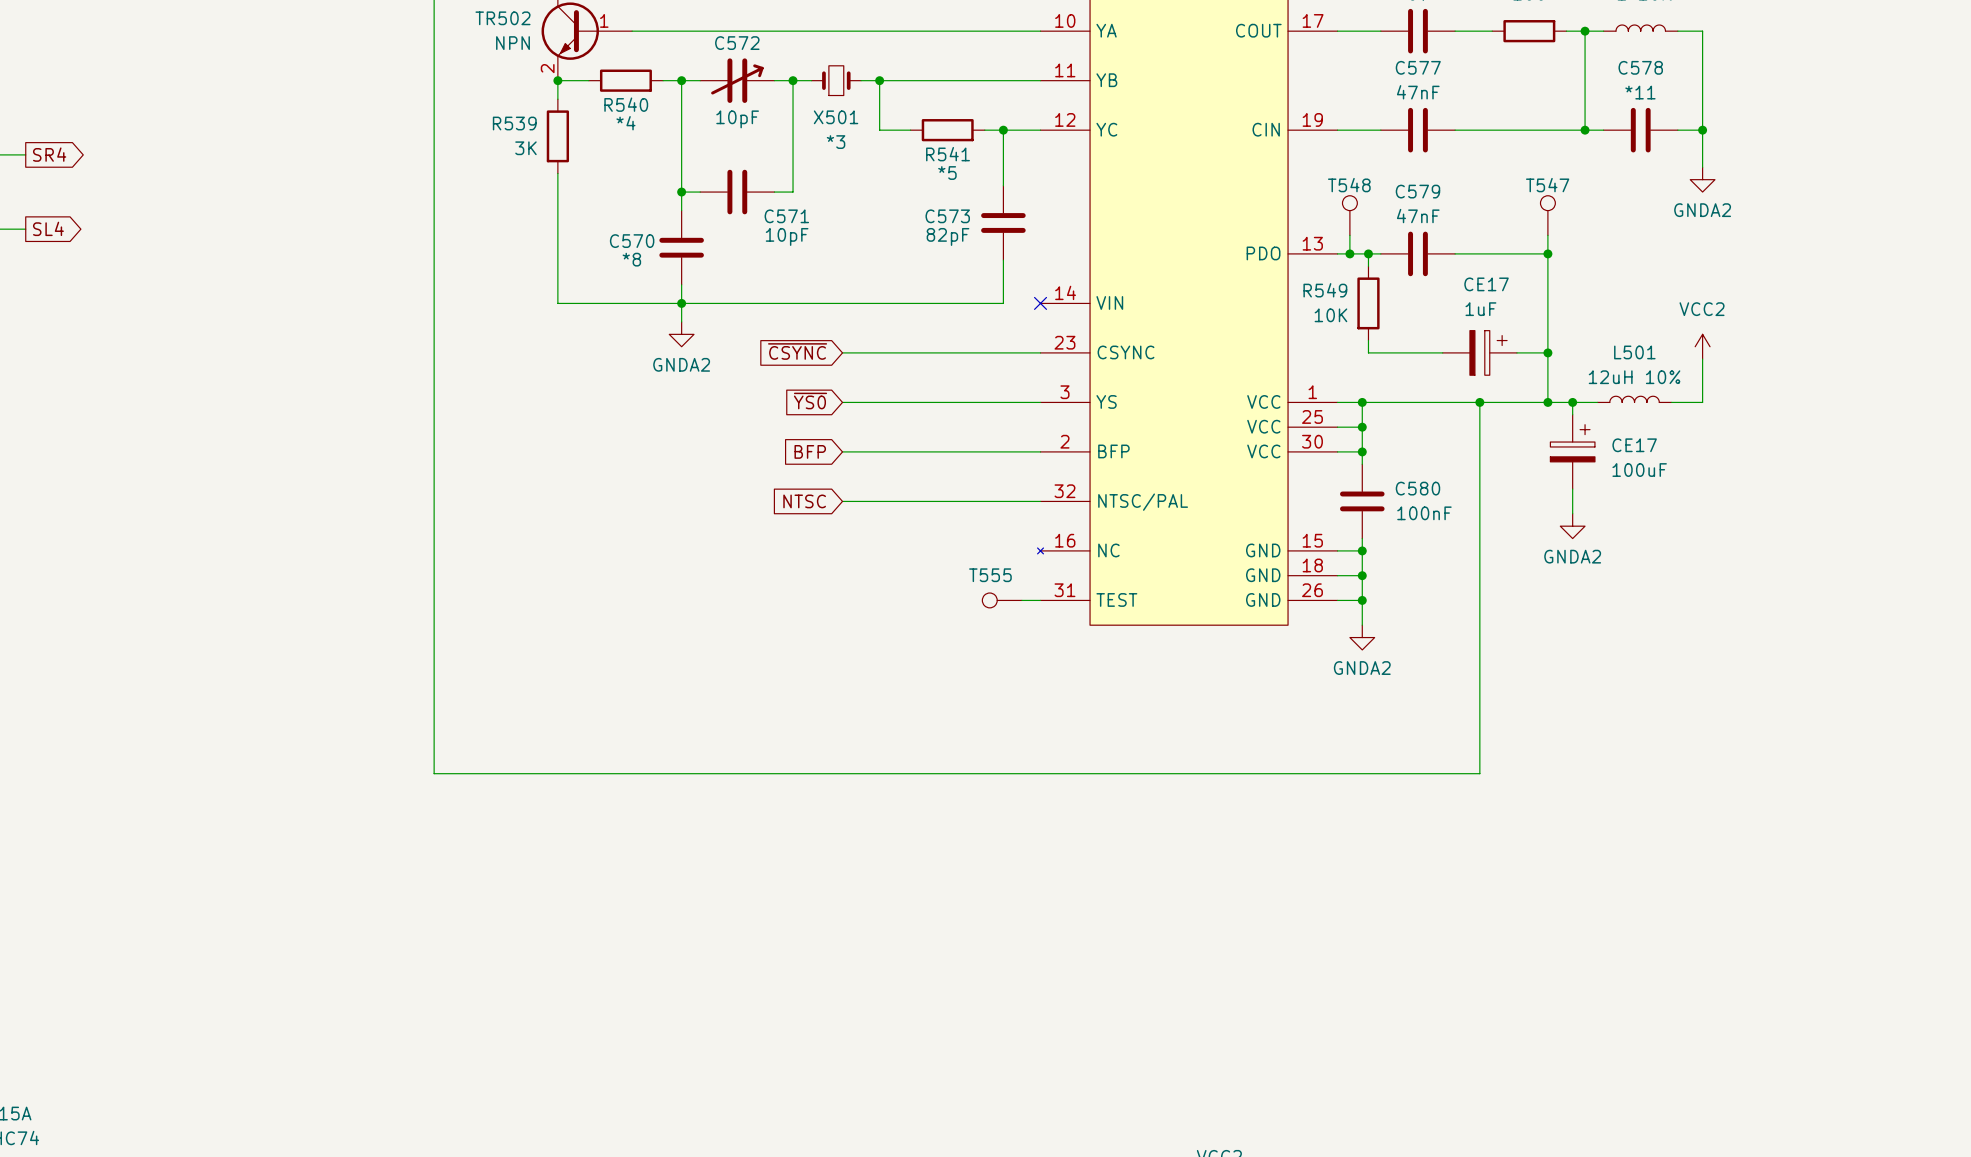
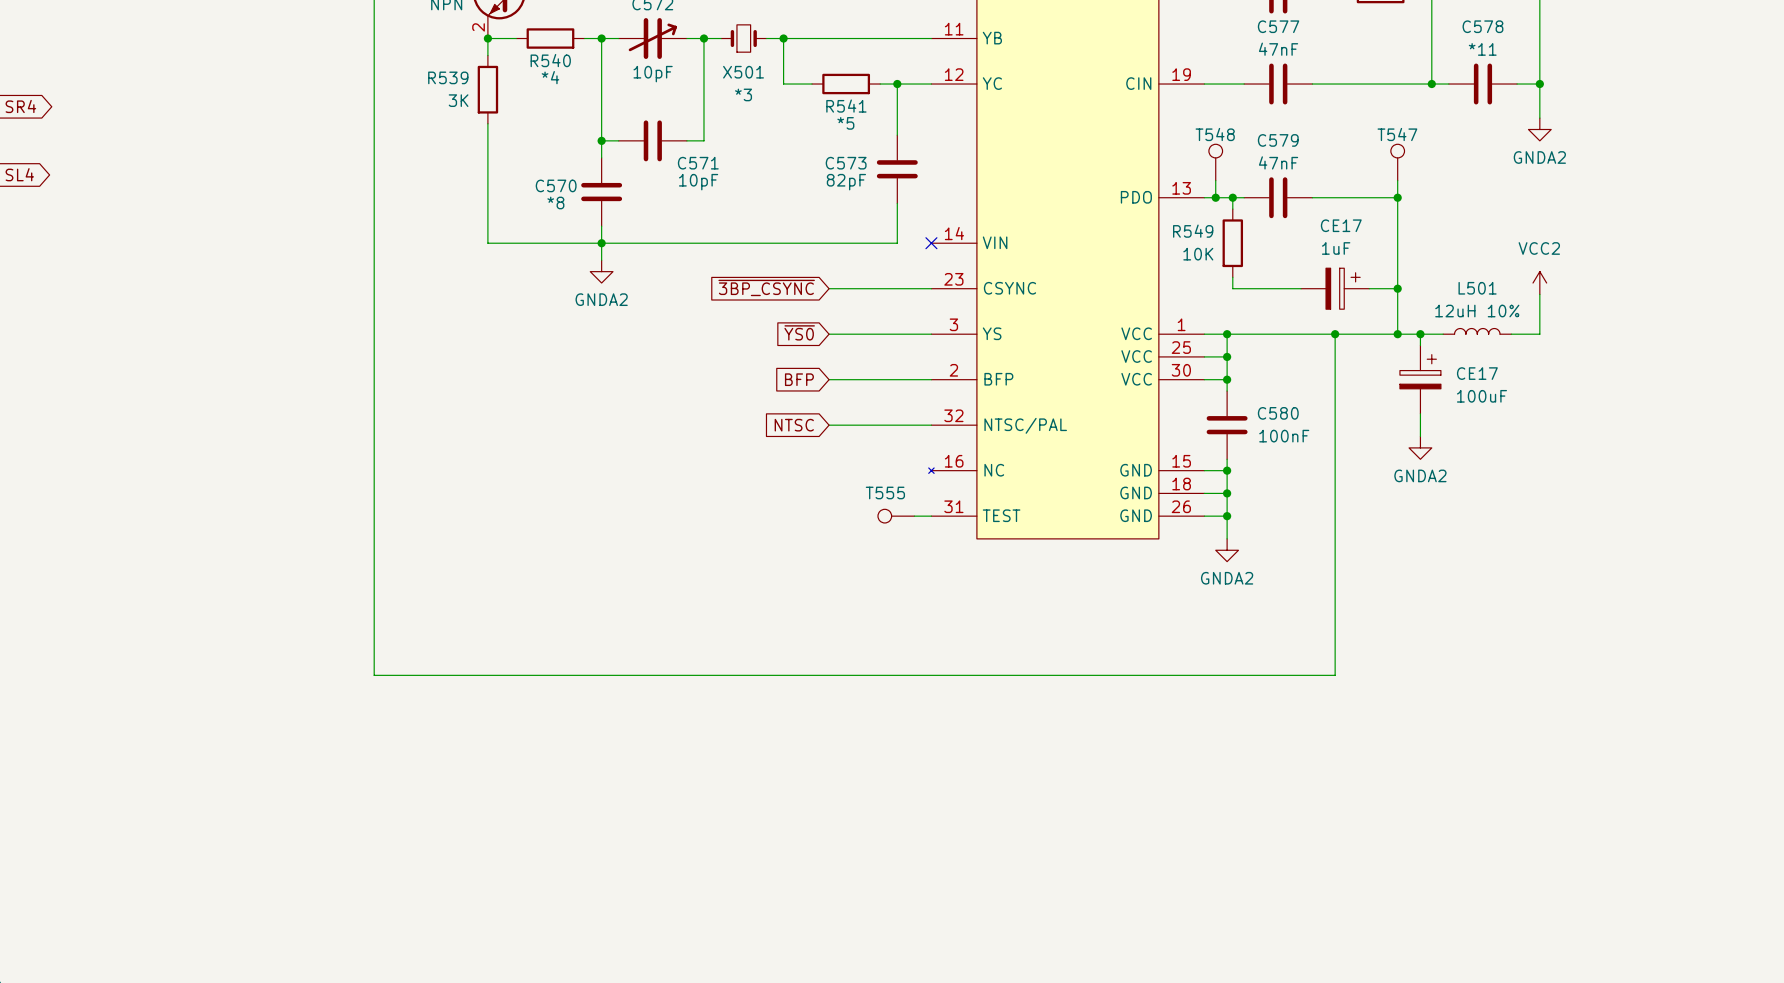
global label: ~{CSYNC} (797, 351) -> ~{3BP_CSYNC} (766, 287)
wire: (842, 352) (929, 352) -> none
global label position: ~{YS0} (810, 401) -> ~{YS0} (799, 332)
wire: (842, 402) (929, 402) -> none
global label position: BFP (810, 451) -> BFP (799, 379)
wire: (842, 451) (929, 451) -> none
global label position: NTSC (804, 501) -> NTSC (794, 425)
wire: (842, 501) (929, 501) -> none

